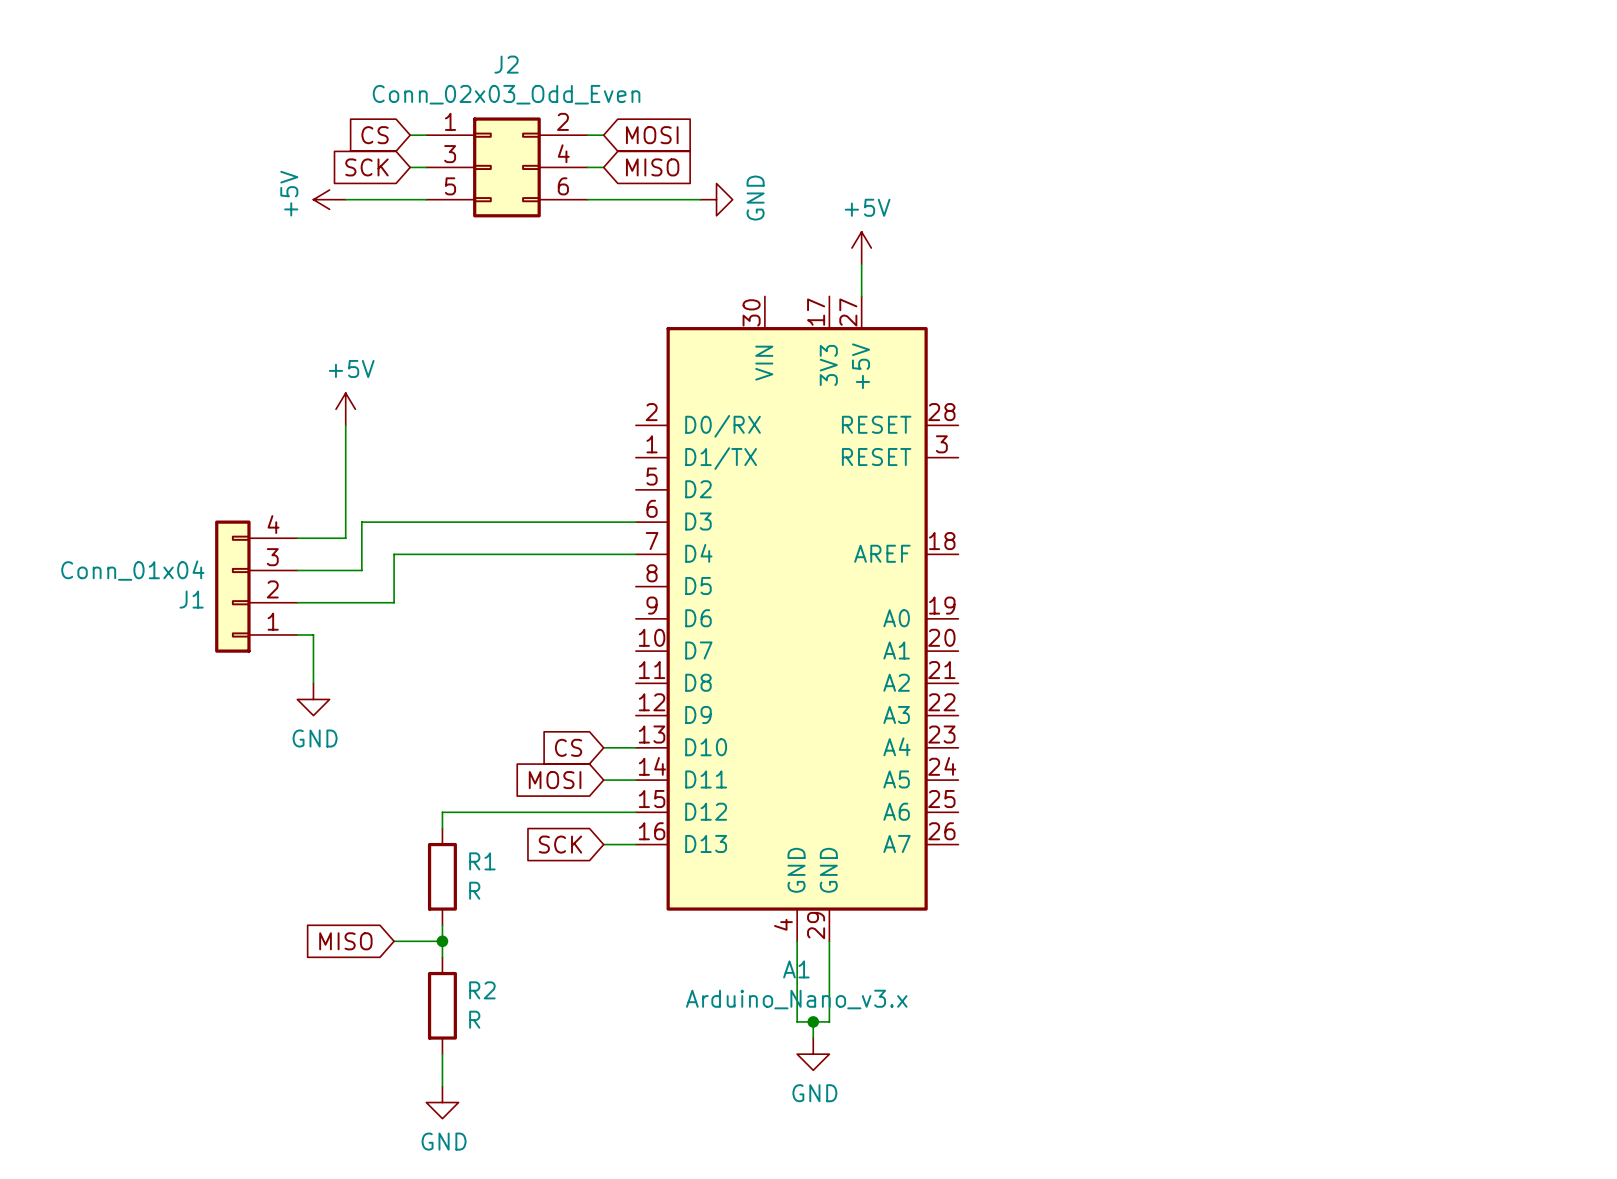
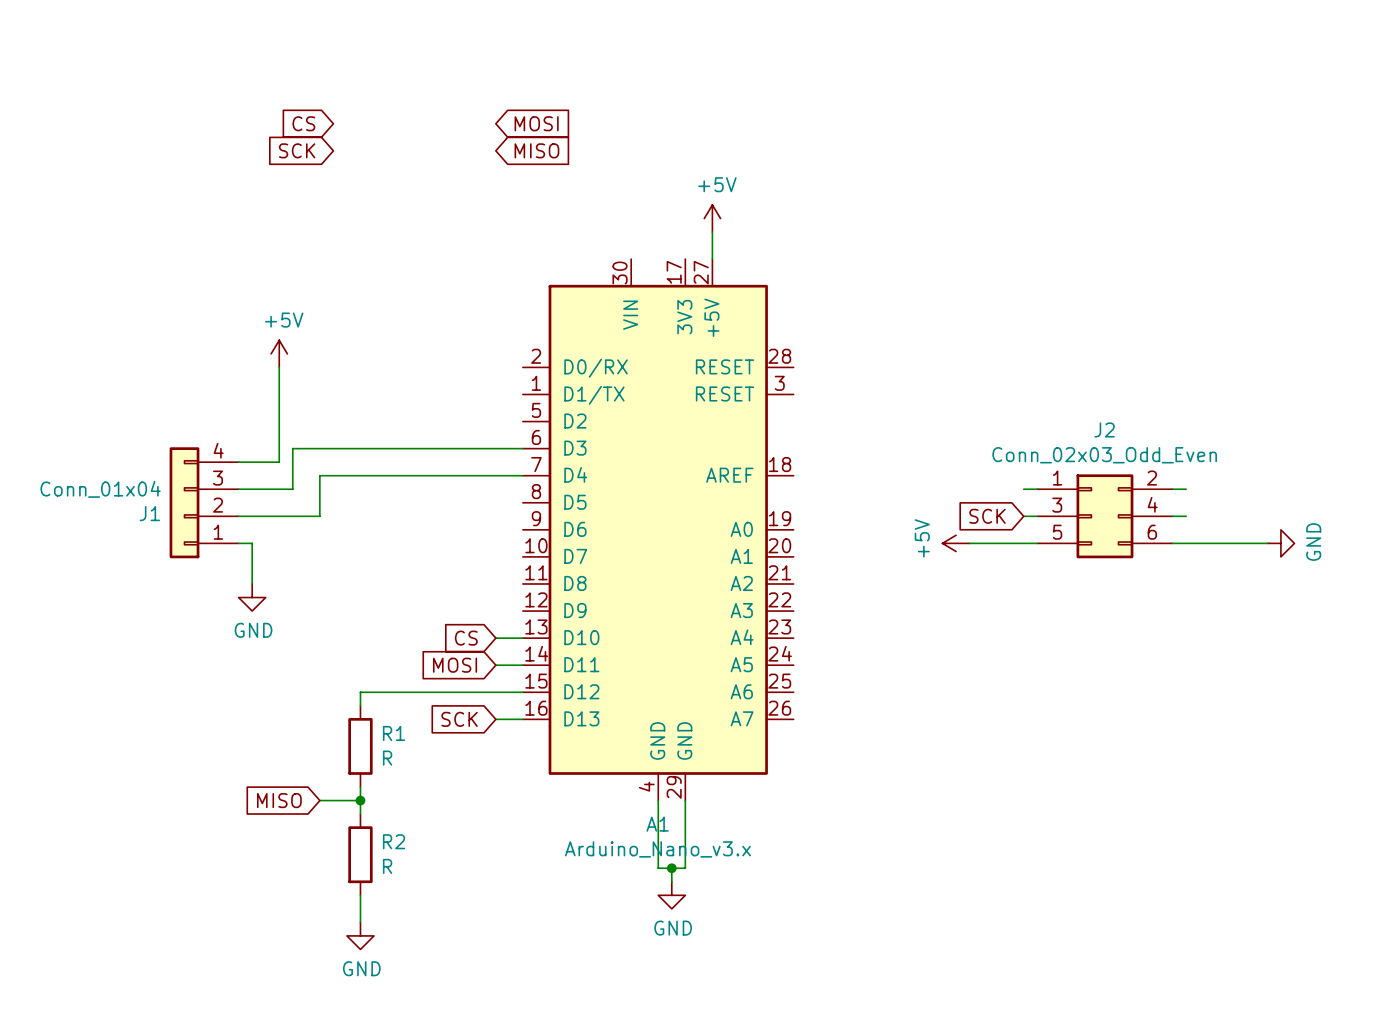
wire: (410, 135) (426, 135) -> none
wire: (587, 135) (603, 135) -> none
wire: (410, 167) (426, 167) -> none
J2 position: (506, 167) -> (1104, 516)
wire: (587, 167) (603, 167) -> none
power symbol: +5V (329, 199) -> none
wire: (345, 199) (426, 199) -> none
wire: (587, 199) (700, 199) -> none
power symbol: GND (716, 199) -> none
wire: none -> (1023, 489) (1037, 489)
wire: none -> (1172, 489) (1186, 489)
global label: none -> SCK (987, 516)
wire: none -> (1023, 516) (1037, 516)
wire: none -> (1172, 516) (1186, 516)
power symbol: none -> +5V (956, 543)
wire: none -> (969, 543) (1037, 543)
wire: none -> (1172, 543) (1267, 543)
power symbol: none -> GND (1280, 543)

